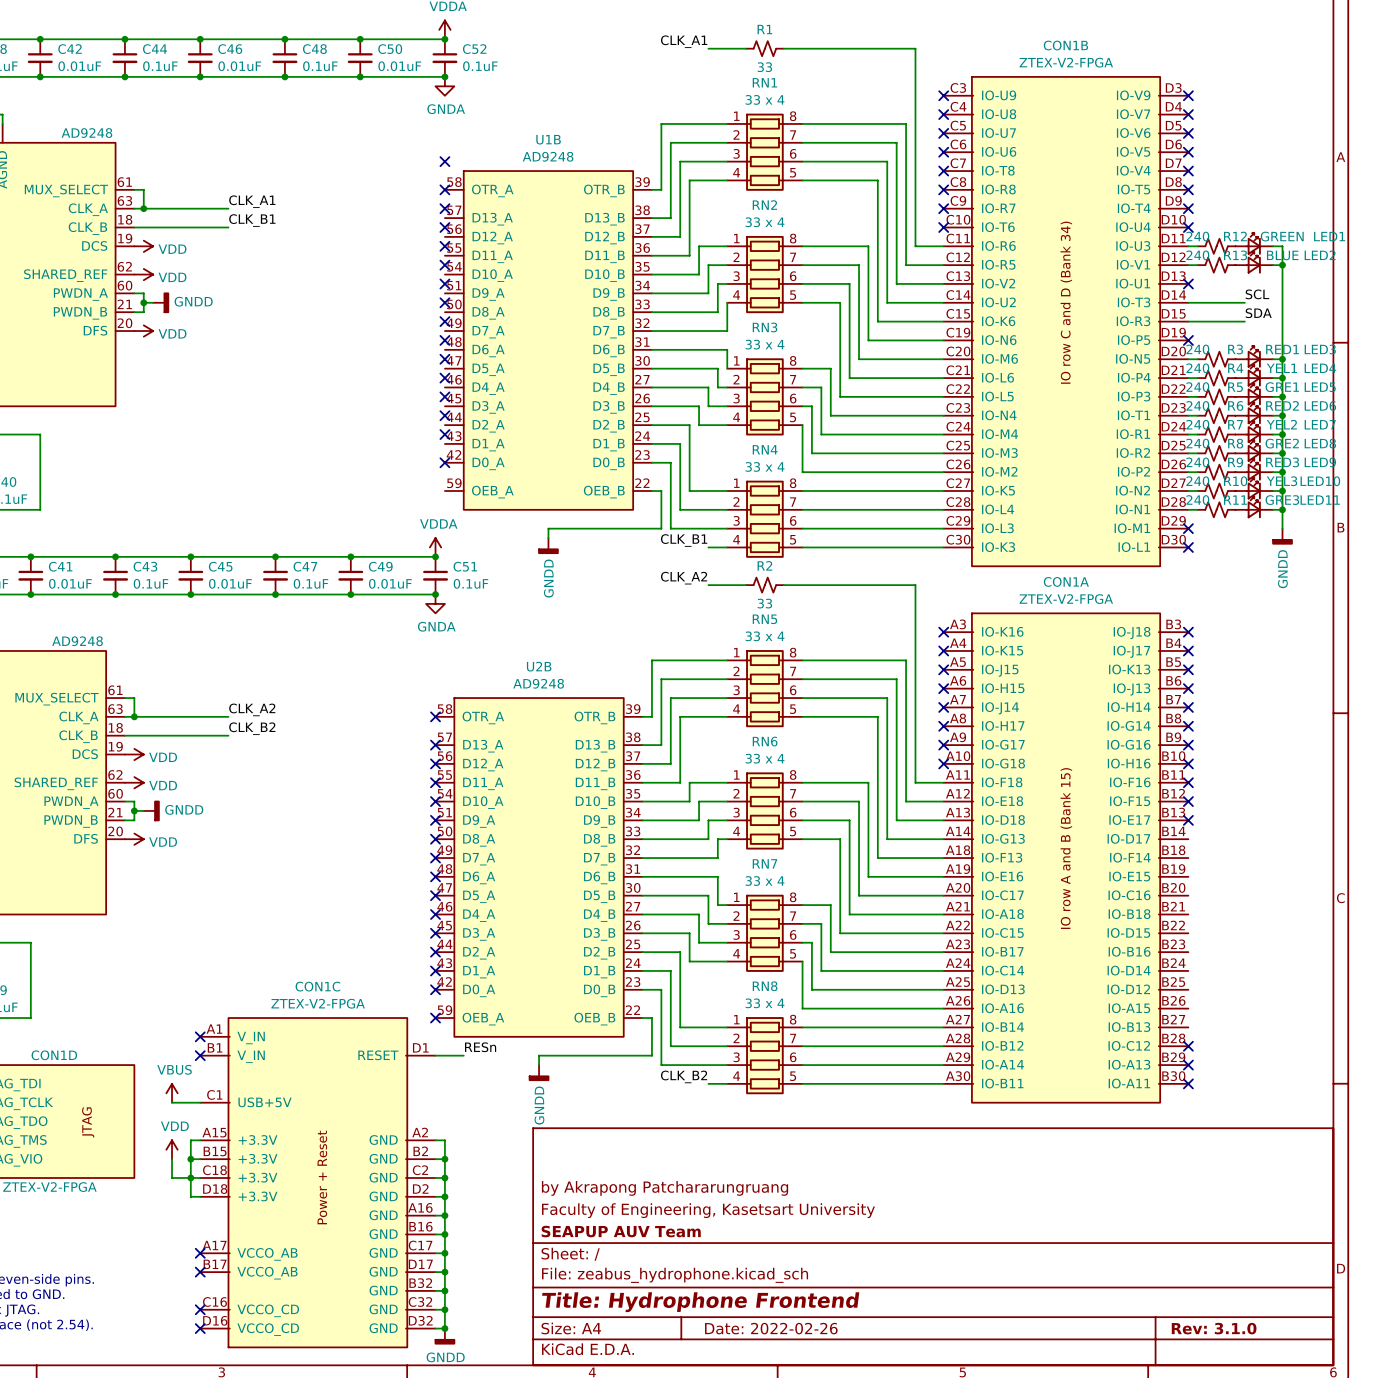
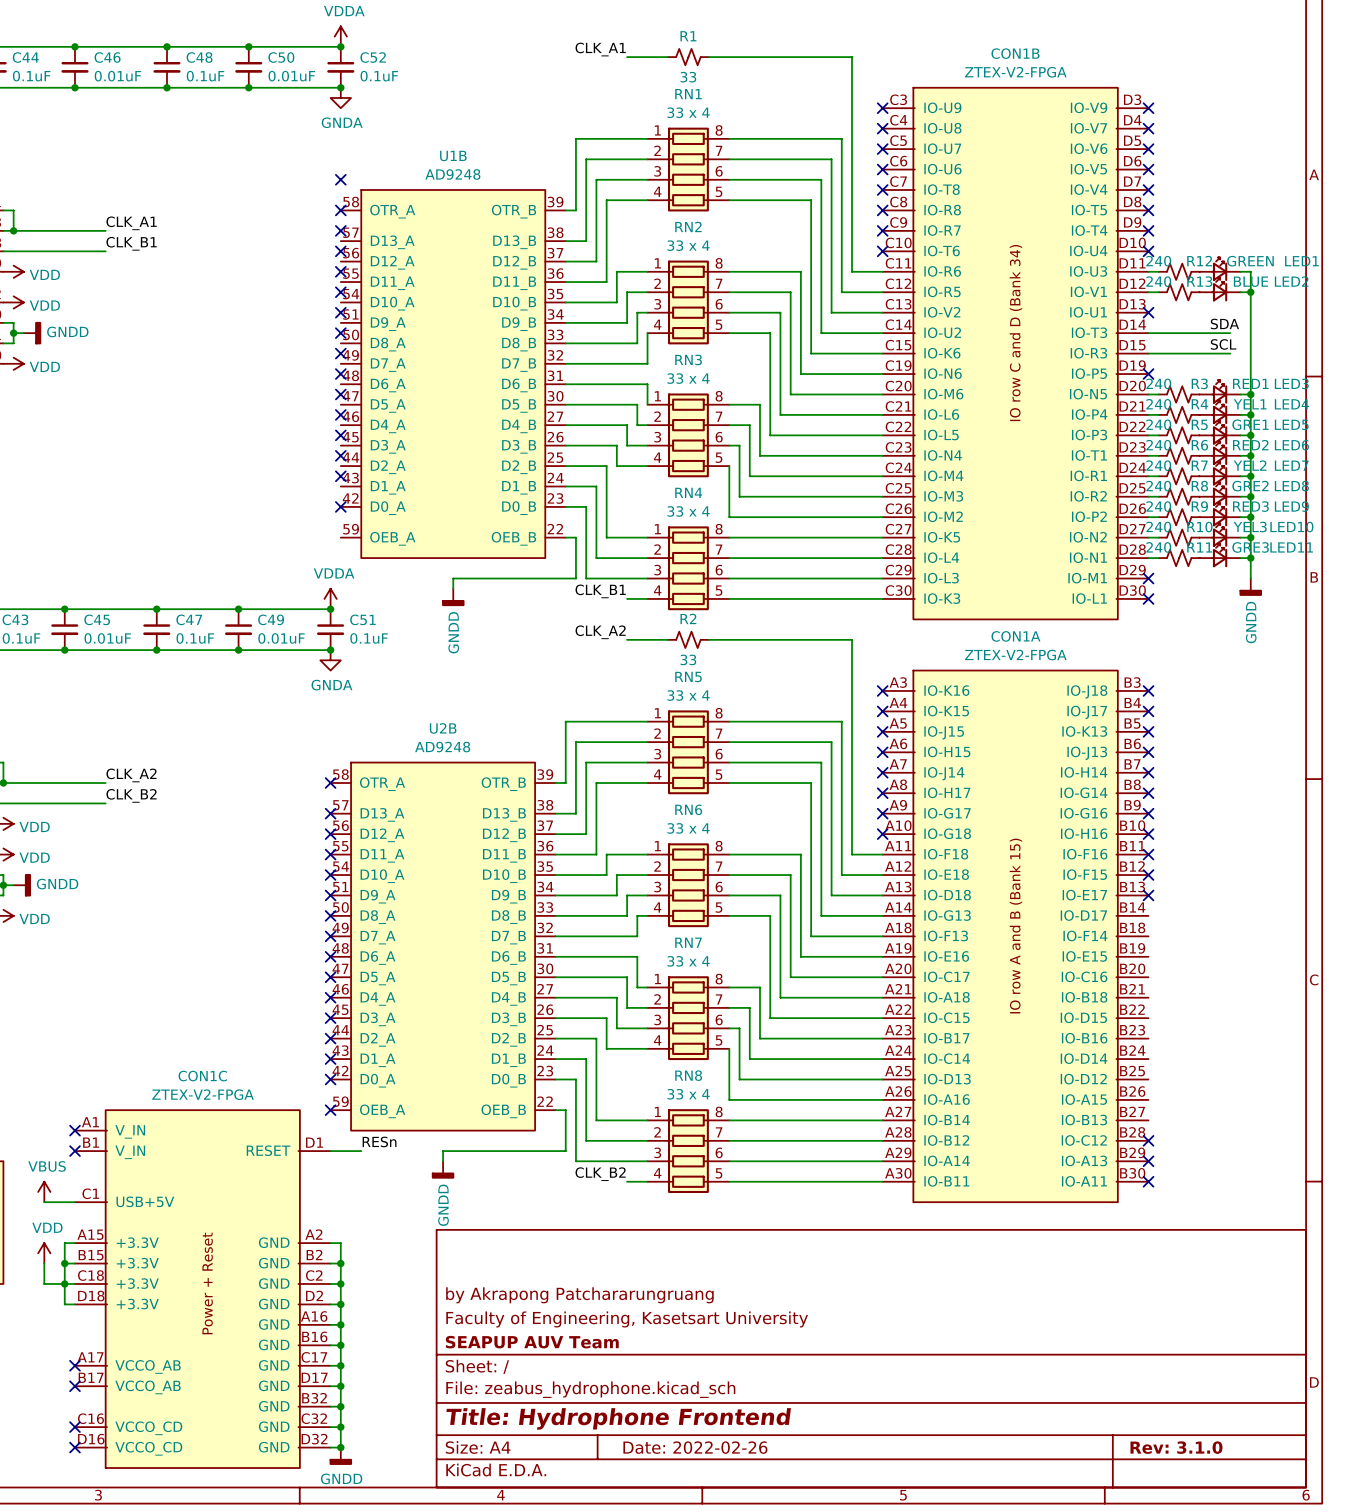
label: SCL (1257, 294) -> SDA (1224, 324)
wire: none -> (1209, 333) (1230, 333)
label: SDA (1258, 313) -> SCL (1223, 344)
wire: none -> (1209, 353) (1230, 353)

